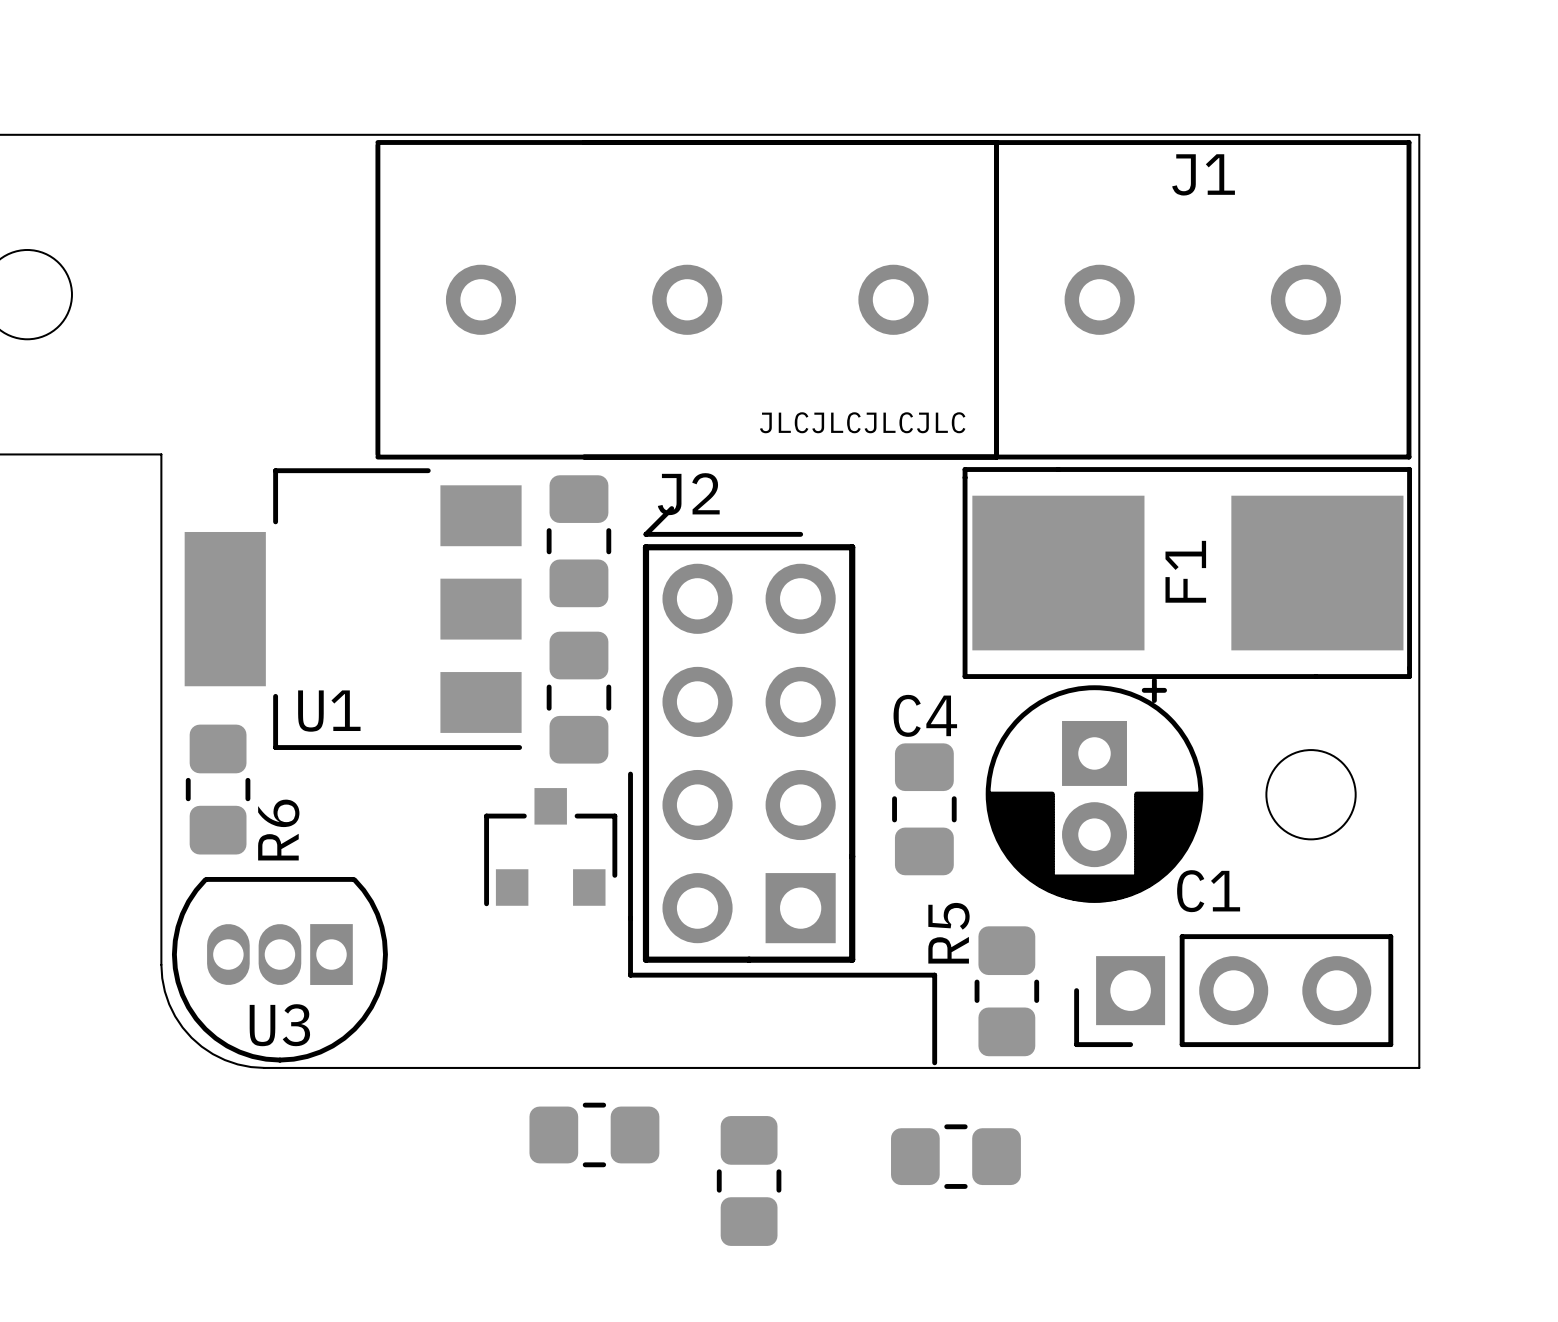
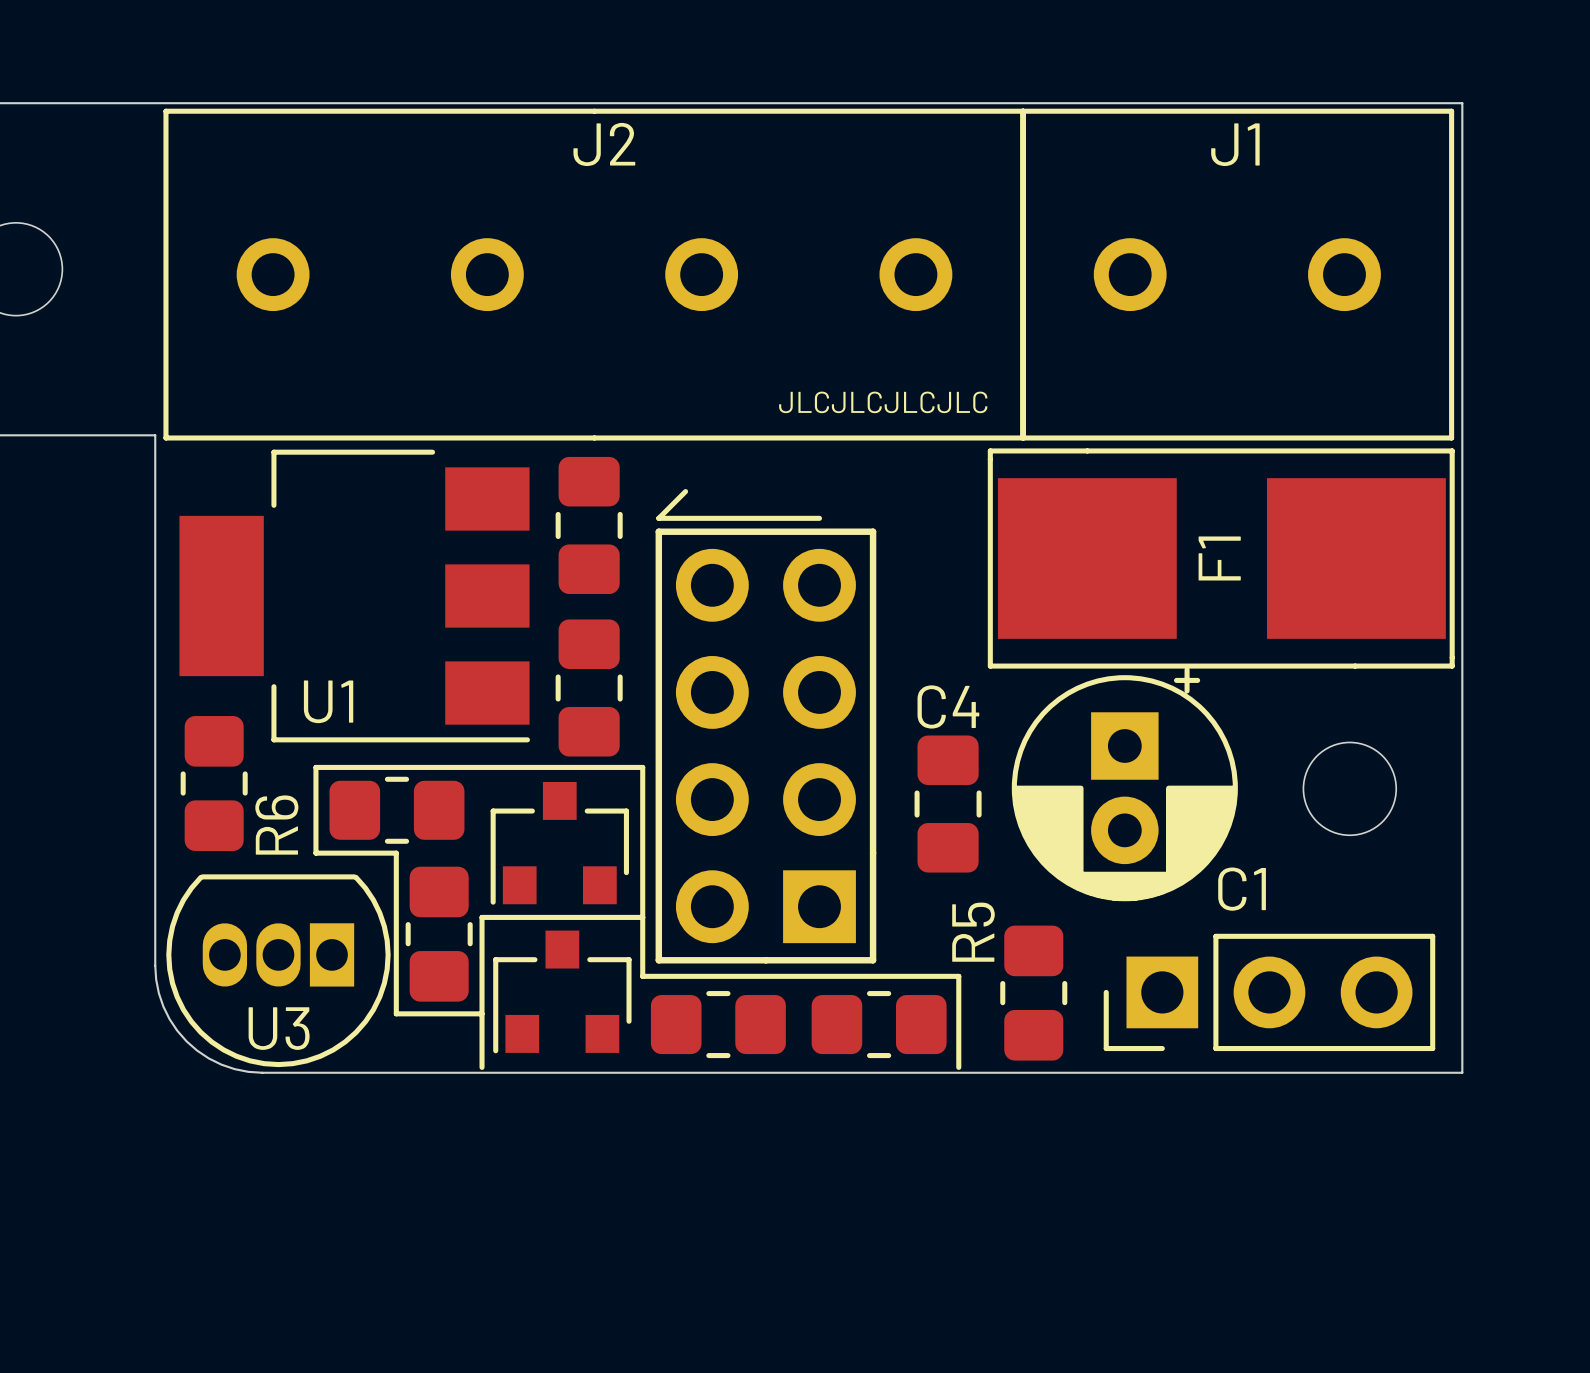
J2 footprint: [375, 140, 999, 460] -> [163, 108, 1026, 441]
J2 name position: J2 (688, 494) -> J2 (604, 144)
line: none -> (642, 767) (315, 767) (315, 853) (396, 853) (396, 1013) (482, 1013)
part: none -> (396, 810)
line: none -> (642, 917) (482, 917) (482, 1067)
part: none -> (439, 934)
part: none -> (562, 991)
part: none -> (718, 1024)
part: none -> (879, 1024)
part: (594, 1134) -> none
part: (955, 1156) -> none
part: (749, 1180) -> none

